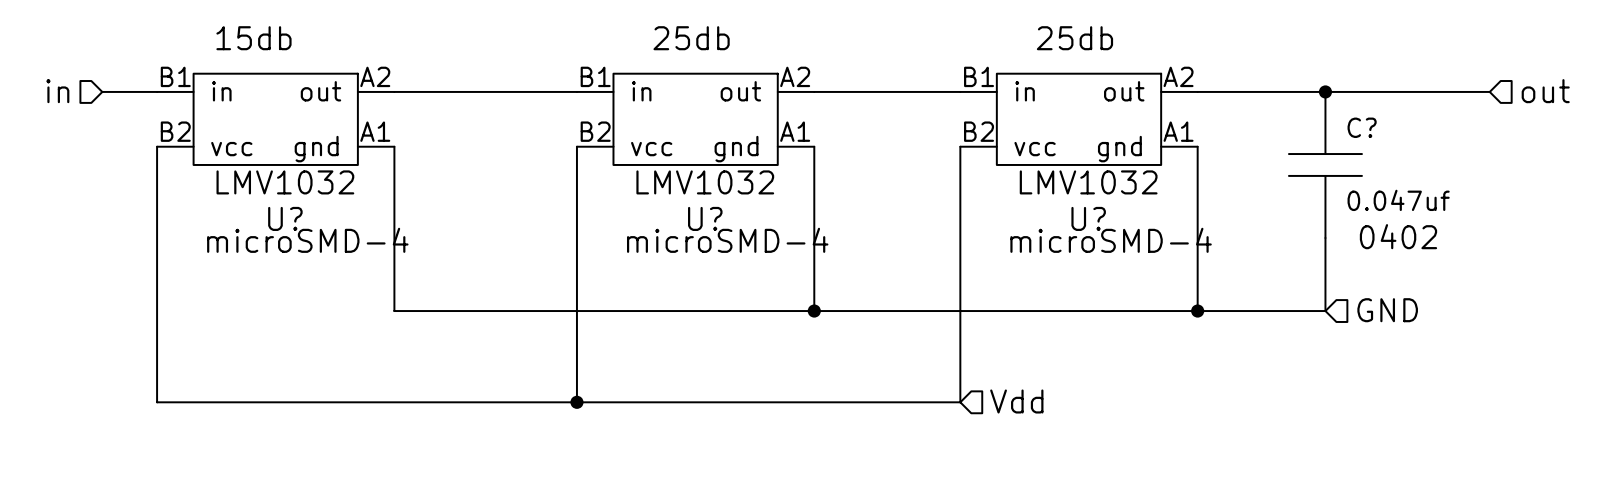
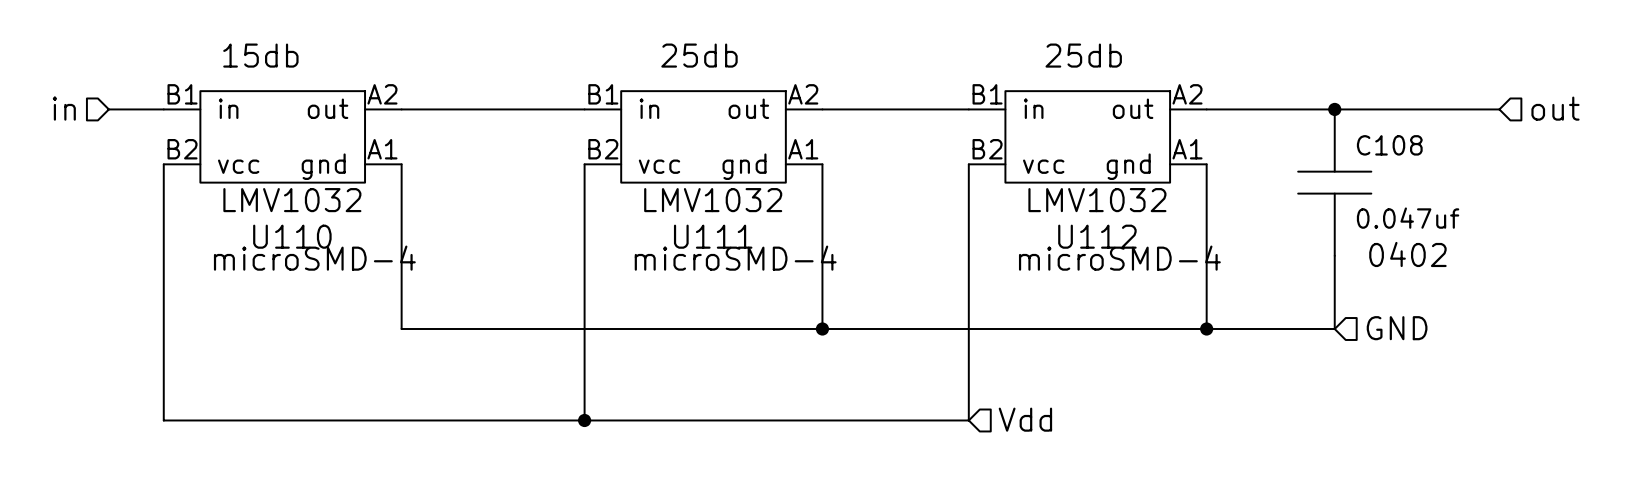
C? name: C? (1362, 127) -> C108 (1389, 145)
U? name: U? (285, 218) -> U110 (292, 236)
U? name: U? (705, 218) -> U111 (713, 236)
U? name: U? (1088, 218) -> U112 (1097, 236)

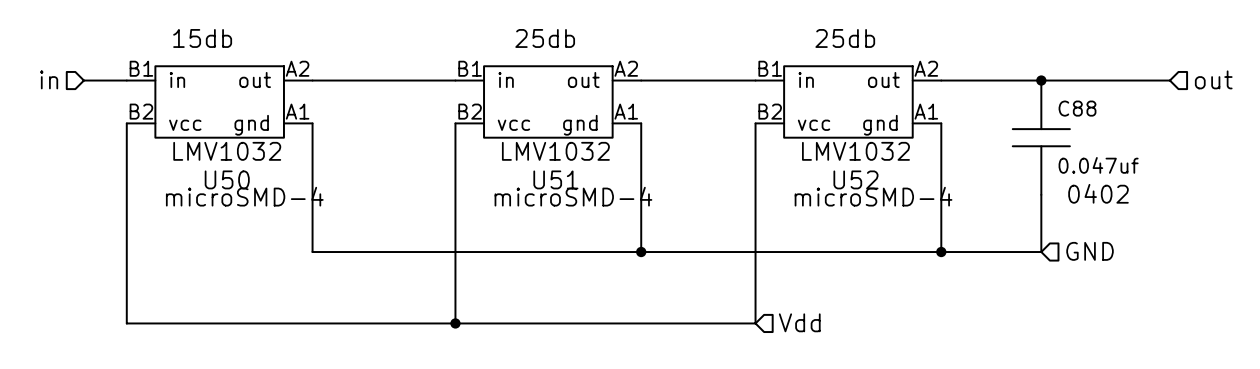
C108 name: C108 (1389, 145) -> C88 (1077, 108)
U110 name: U110 (292, 236) -> U50 (227, 179)
U111 name: U111 (713, 236) -> U51 (555, 179)
U112 name: U112 (1097, 236) -> U52 (855, 179)

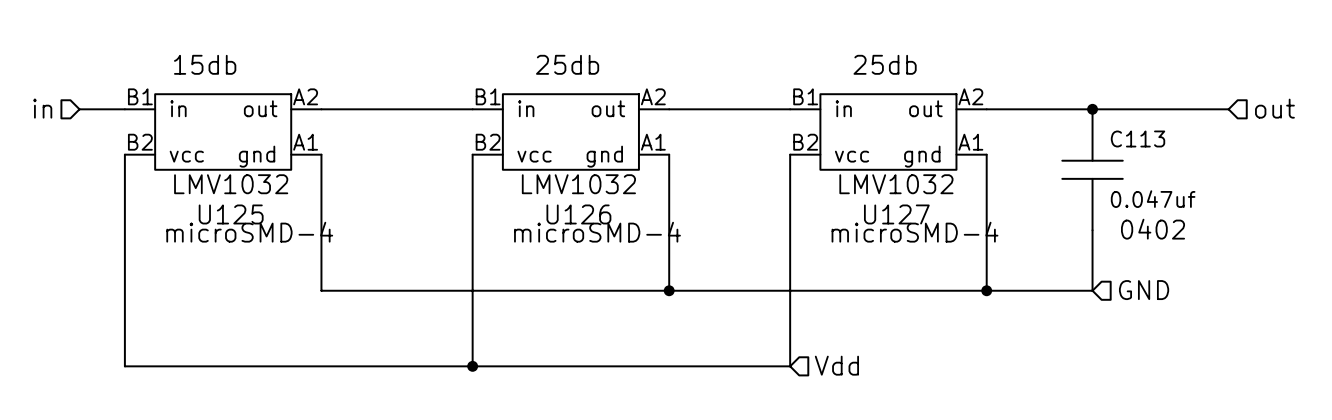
C88 name: C88 (1077, 108) -> C113 (1138, 138)
U50 name: U50 (227, 179) -> U125 (231, 214)
U51 name: U51 (555, 179) -> U126 (578, 214)
U52 name: U52 (855, 179) -> U127 (896, 214)

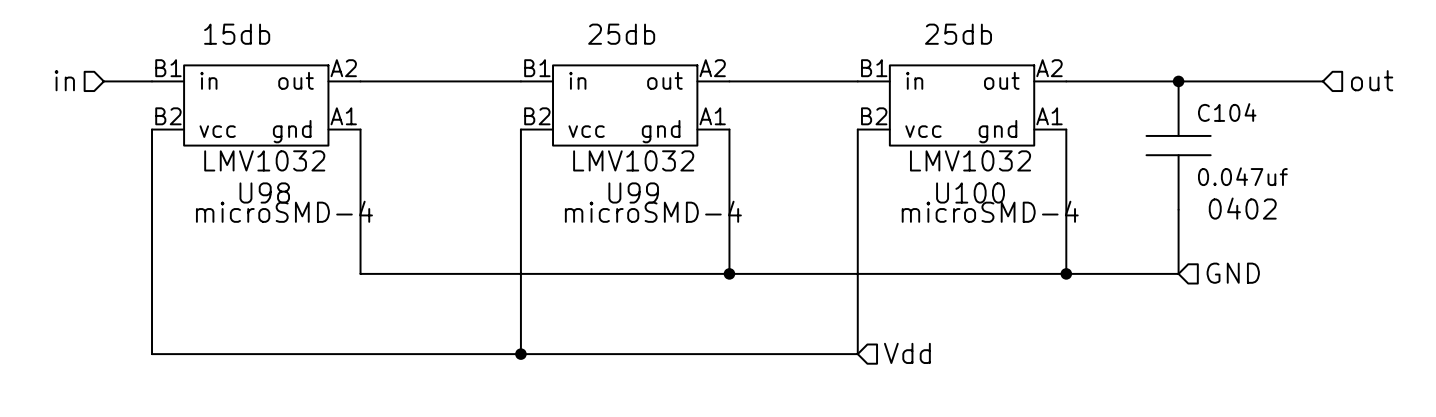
C113 name: C113 (1138, 138) -> C104 (1227, 112)
U125 name: U125 (231, 214) -> U98 (264, 192)
U126 name: U126 (578, 214) -> U99 (633, 192)
U127 name: U127 (896, 214) -> U100 (970, 192)

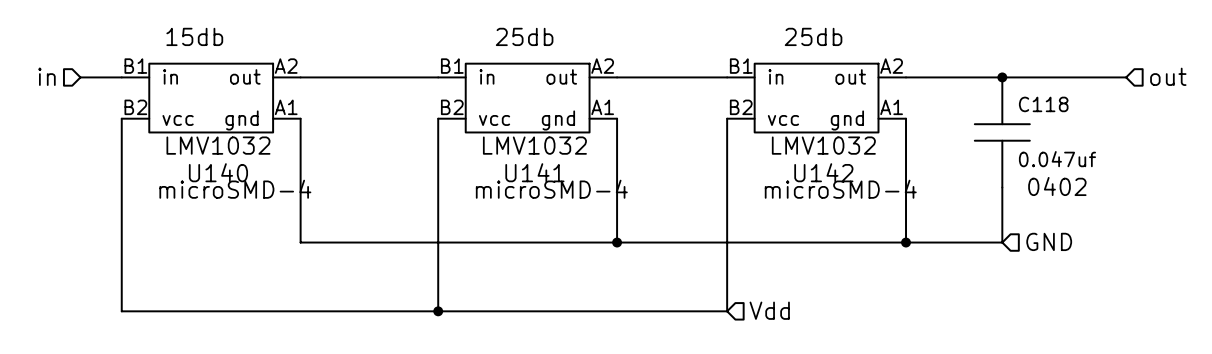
C104 name: C104 (1227, 112) -> C118 (1043, 104)
U98 name: U98 (264, 192) -> U140 (218, 172)
U99 name: U99 (633, 192) -> U141 (534, 172)
U100 name: U100 (970, 192) -> U142 (823, 172)

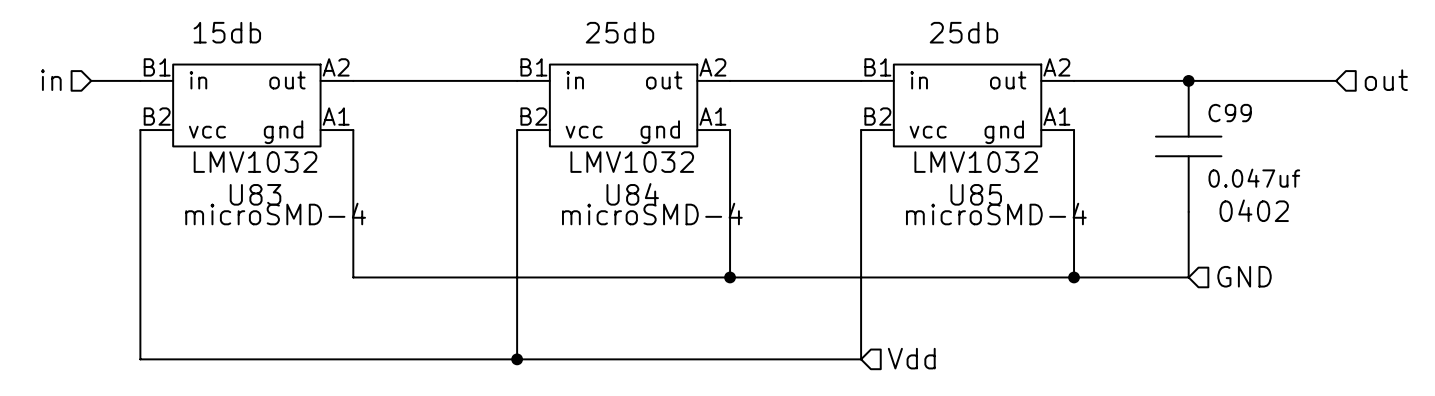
C118 name: C118 (1043, 104) -> C99 (1230, 113)
U140 name: U140 (218, 172) -> U83 (255, 194)
U141 name: U141 (534, 172) -> U84 (632, 194)
U142 name: U142 (823, 172) -> U85 (976, 194)

